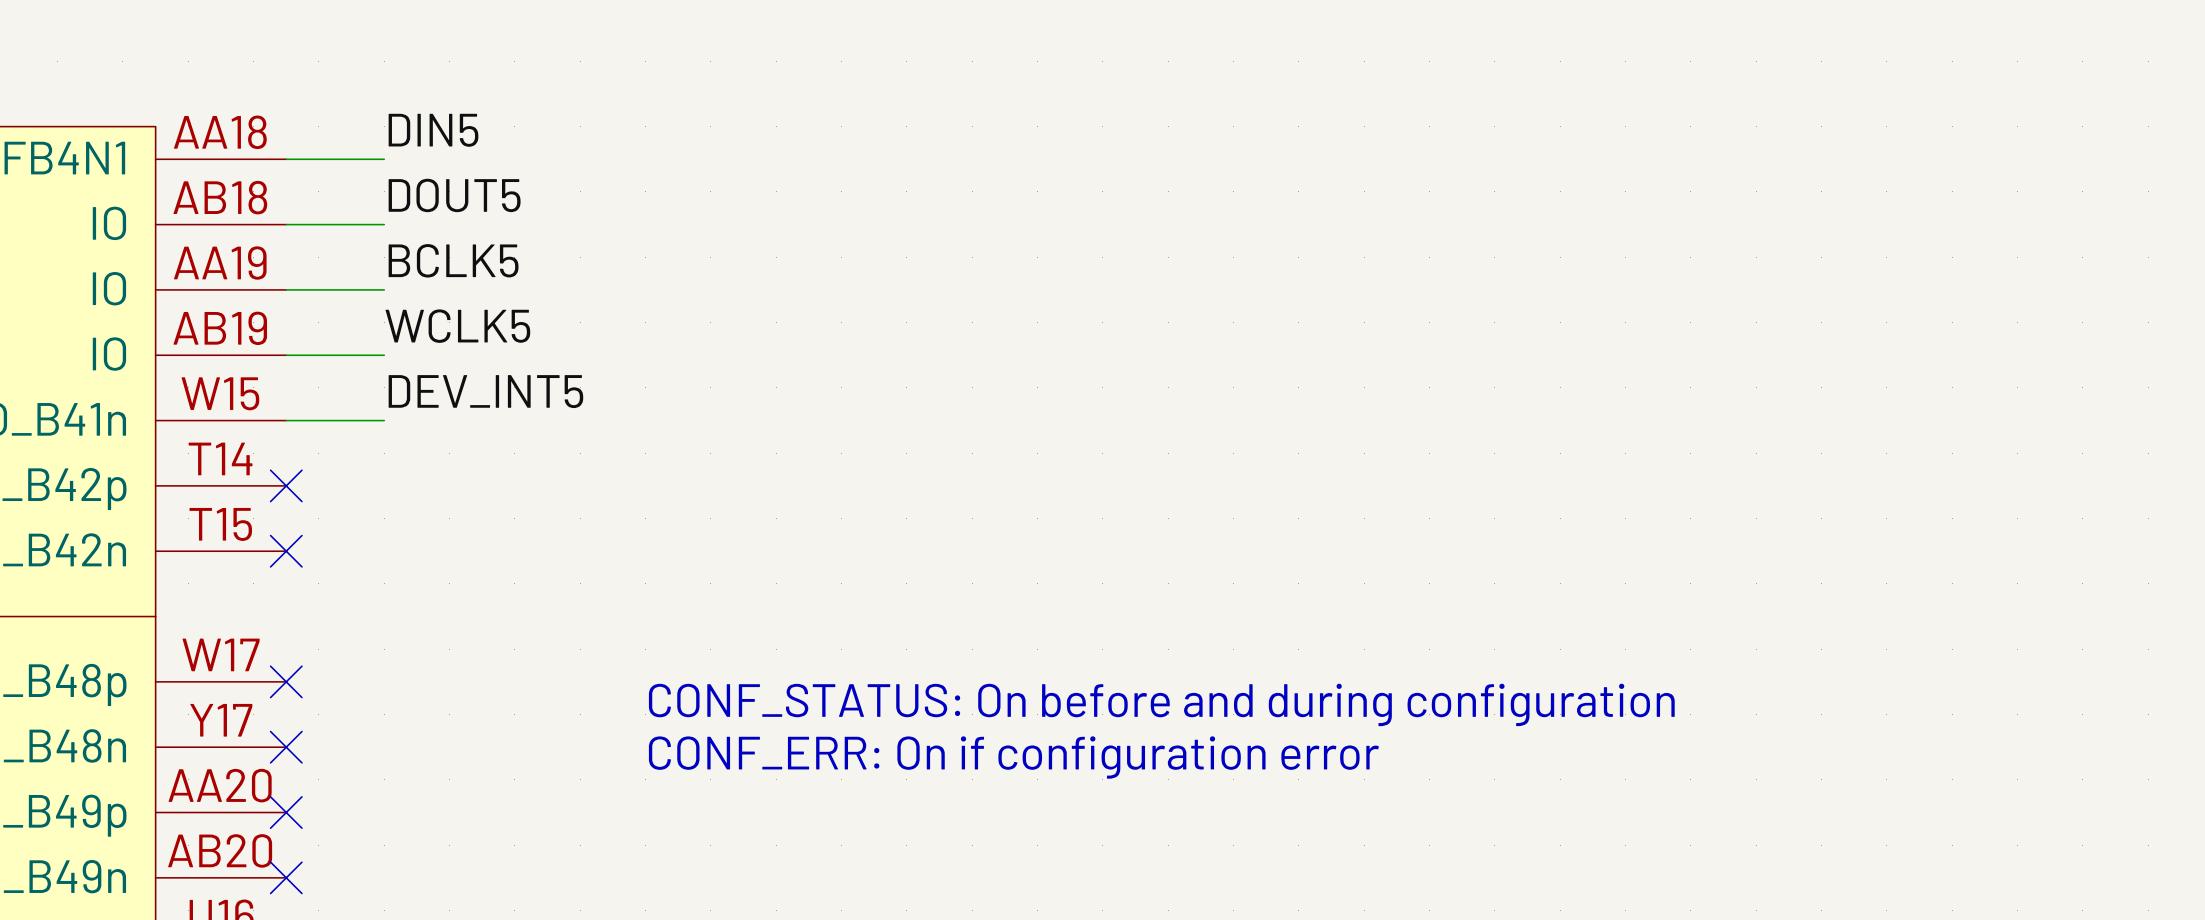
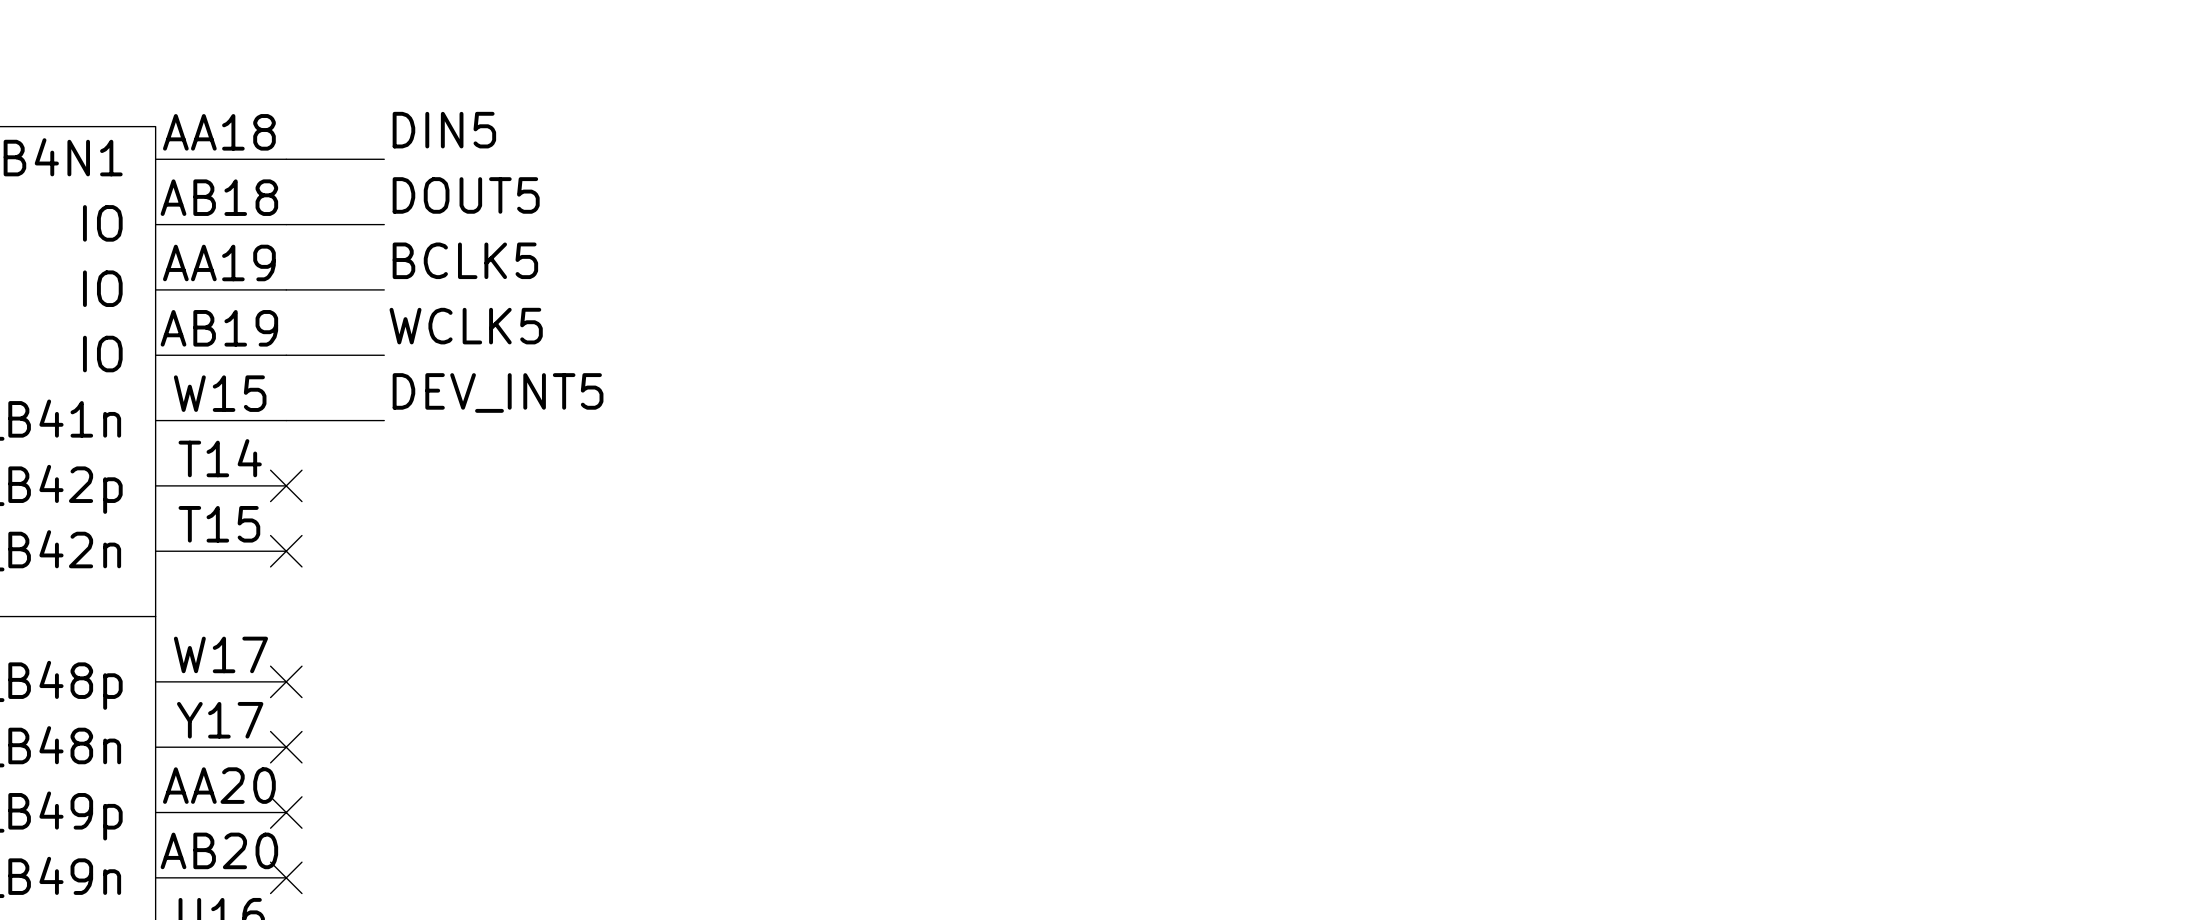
text: CONF_STATUS: On before and during configuration (1161, 704) -> none
text: CONF_ERR: On if configuration error (1013, 757) -> none

